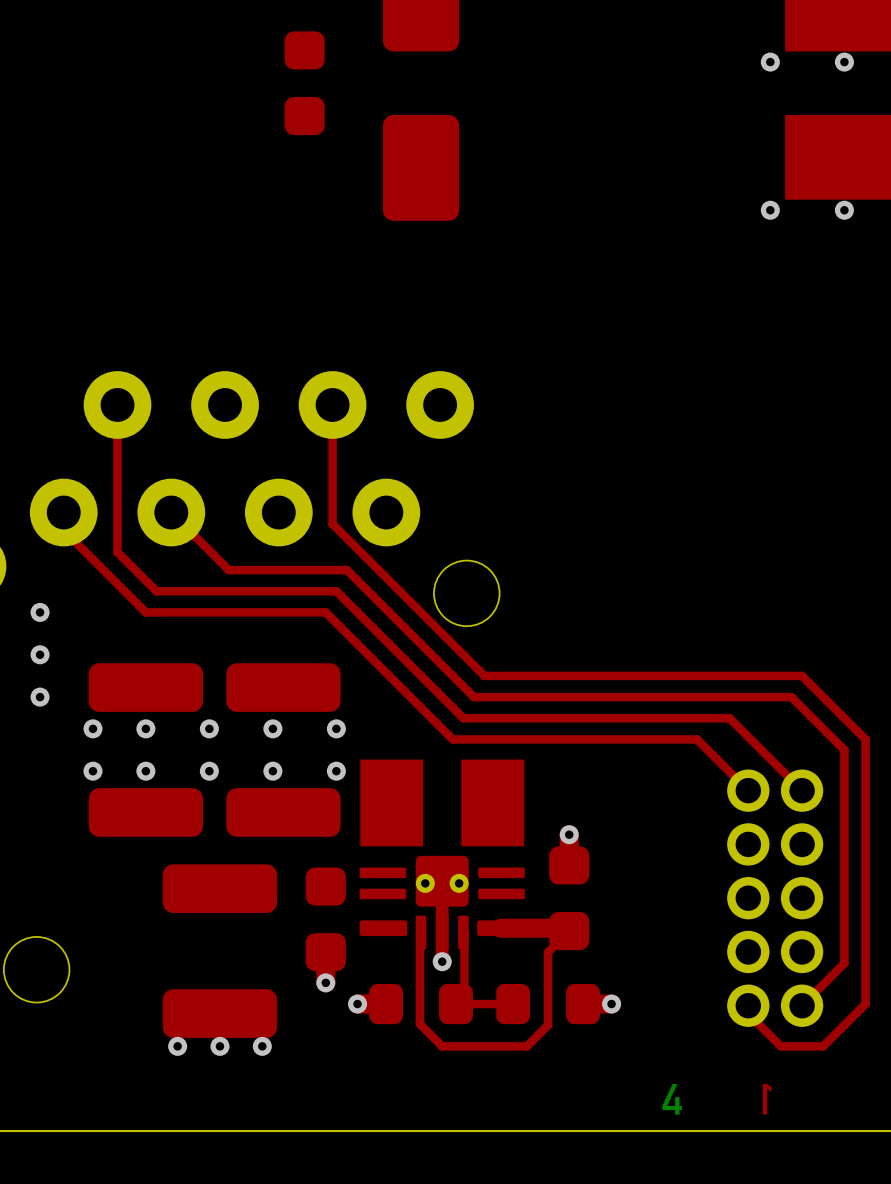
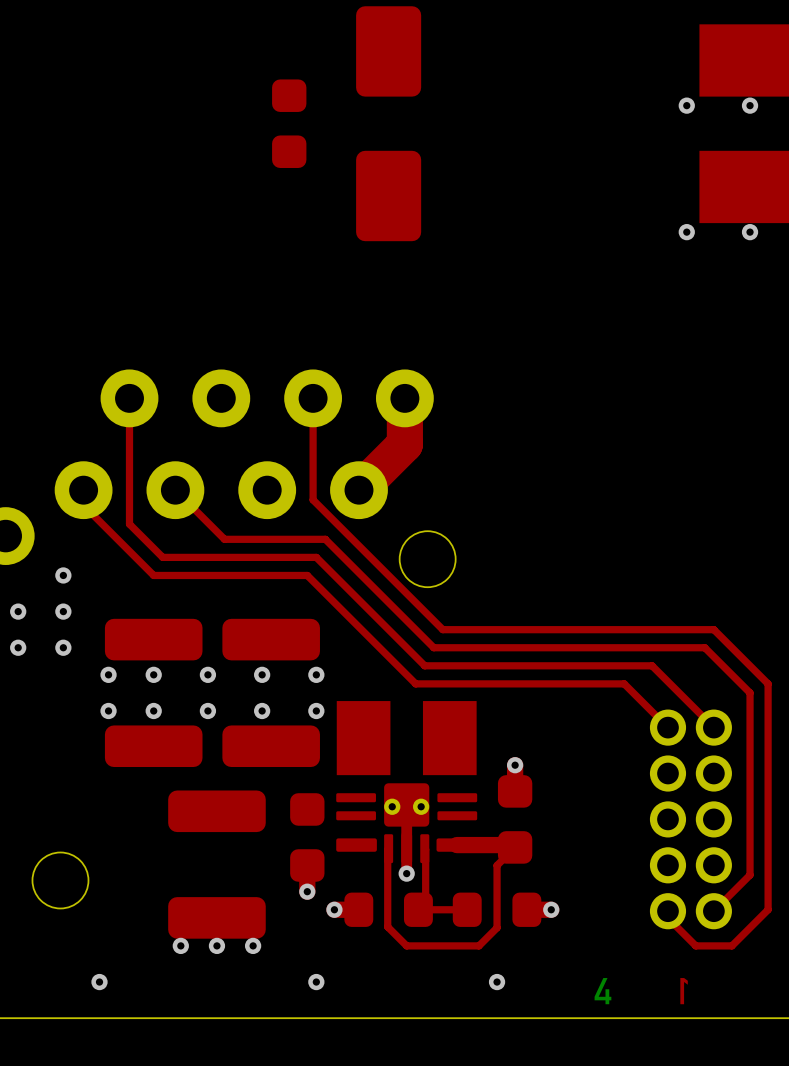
top track: none -> (404, 398) (404, 444) (358, 490)
via: none -> (99, 982)
via: none -> (316, 982)
via: none -> (497, 982)

